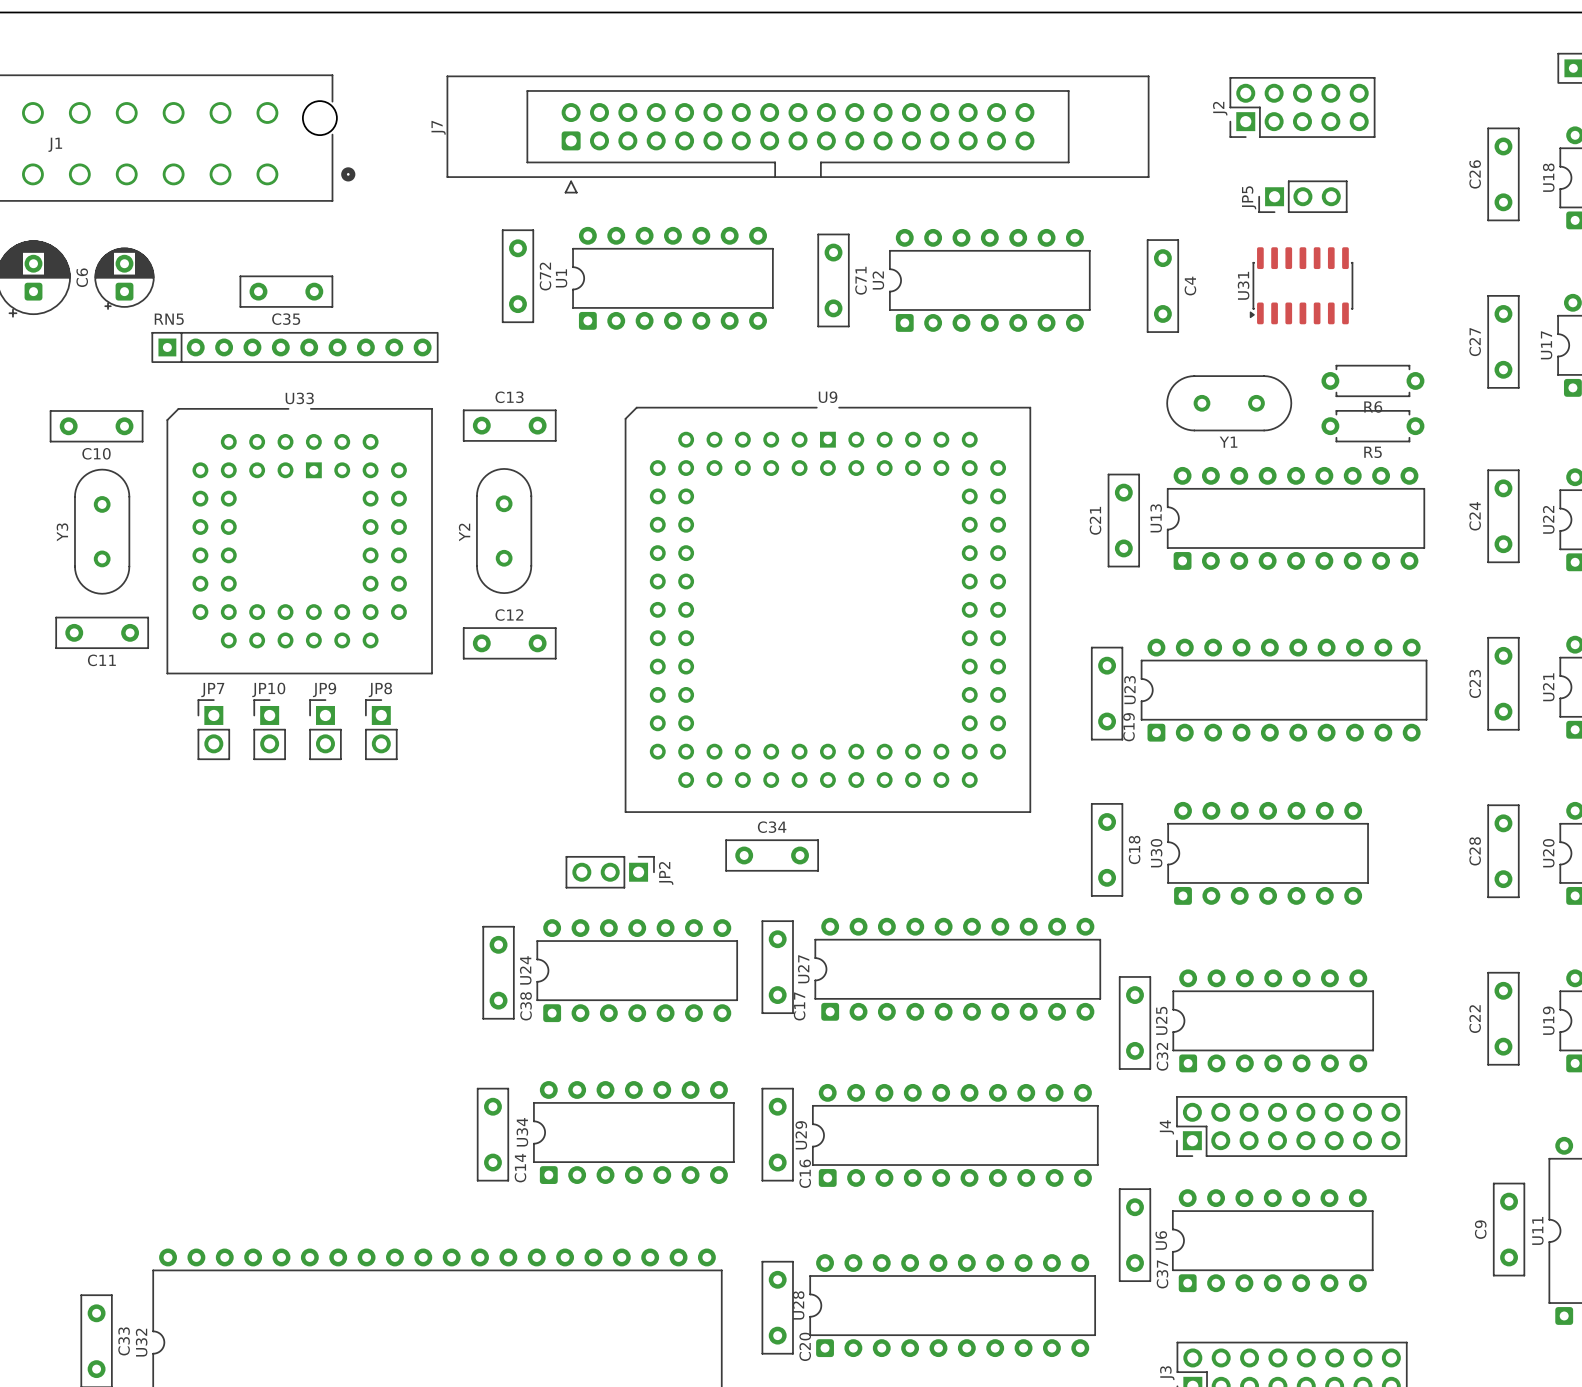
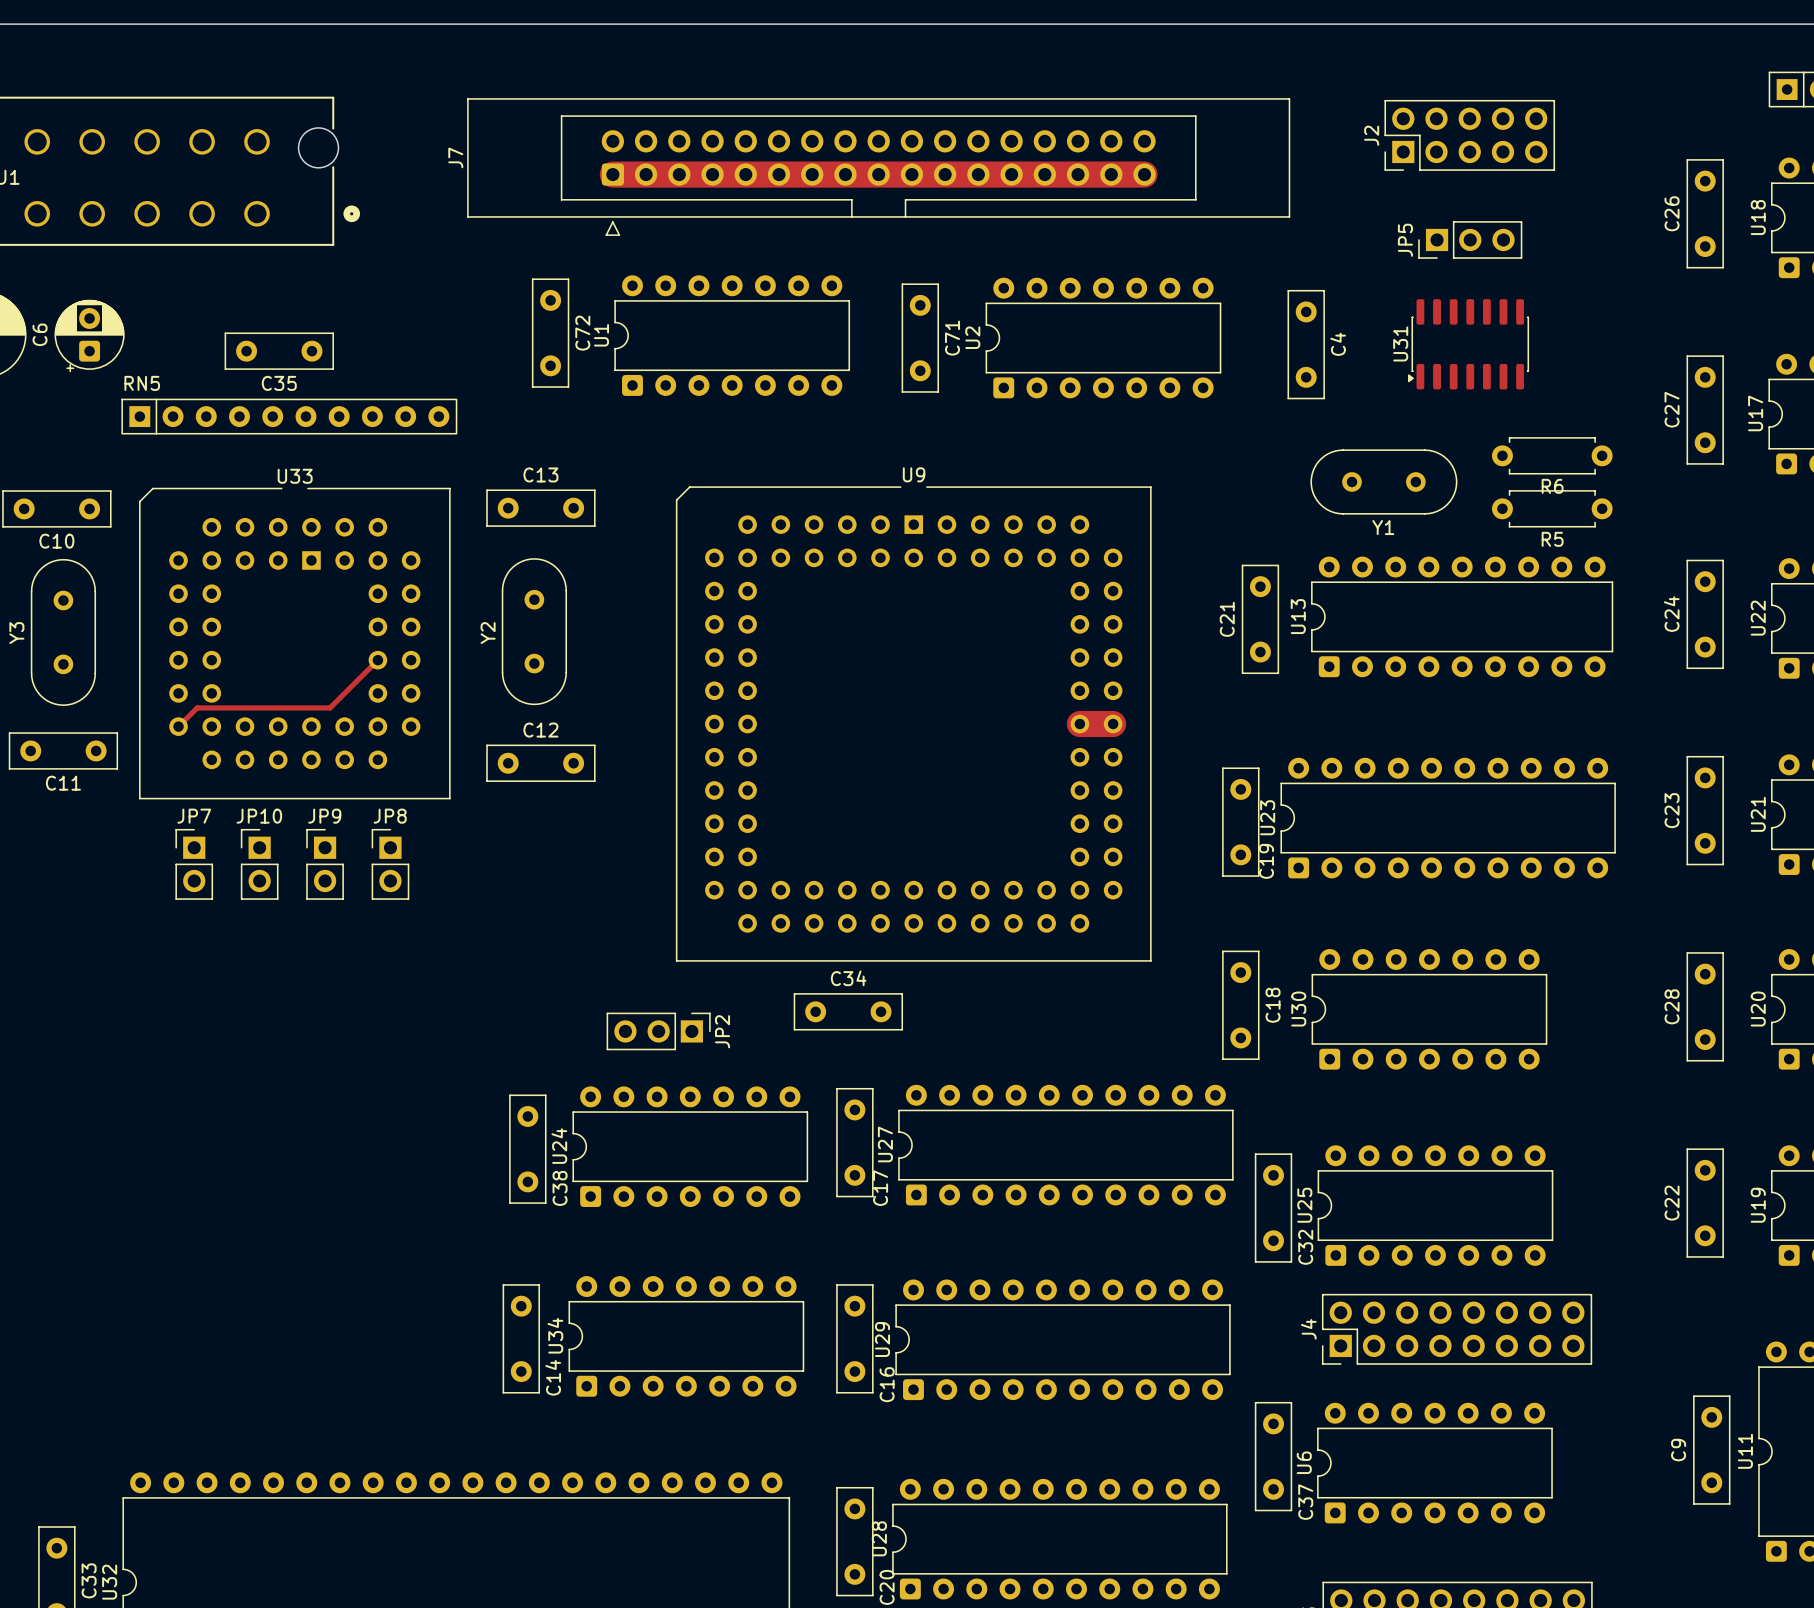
top track: none -> (612, 174) (1144, 174)
top track: none -> (377, 660) (330, 707) (197, 707) (178, 726)
top track: none -> (1079, 724) (1113, 724)

